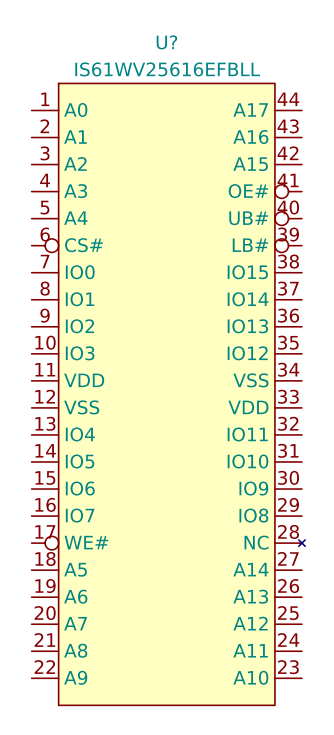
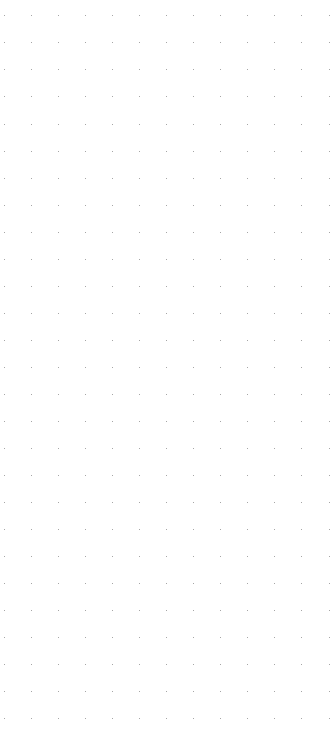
U?: IS61WV25616EFBLL (168, 394) -> none

